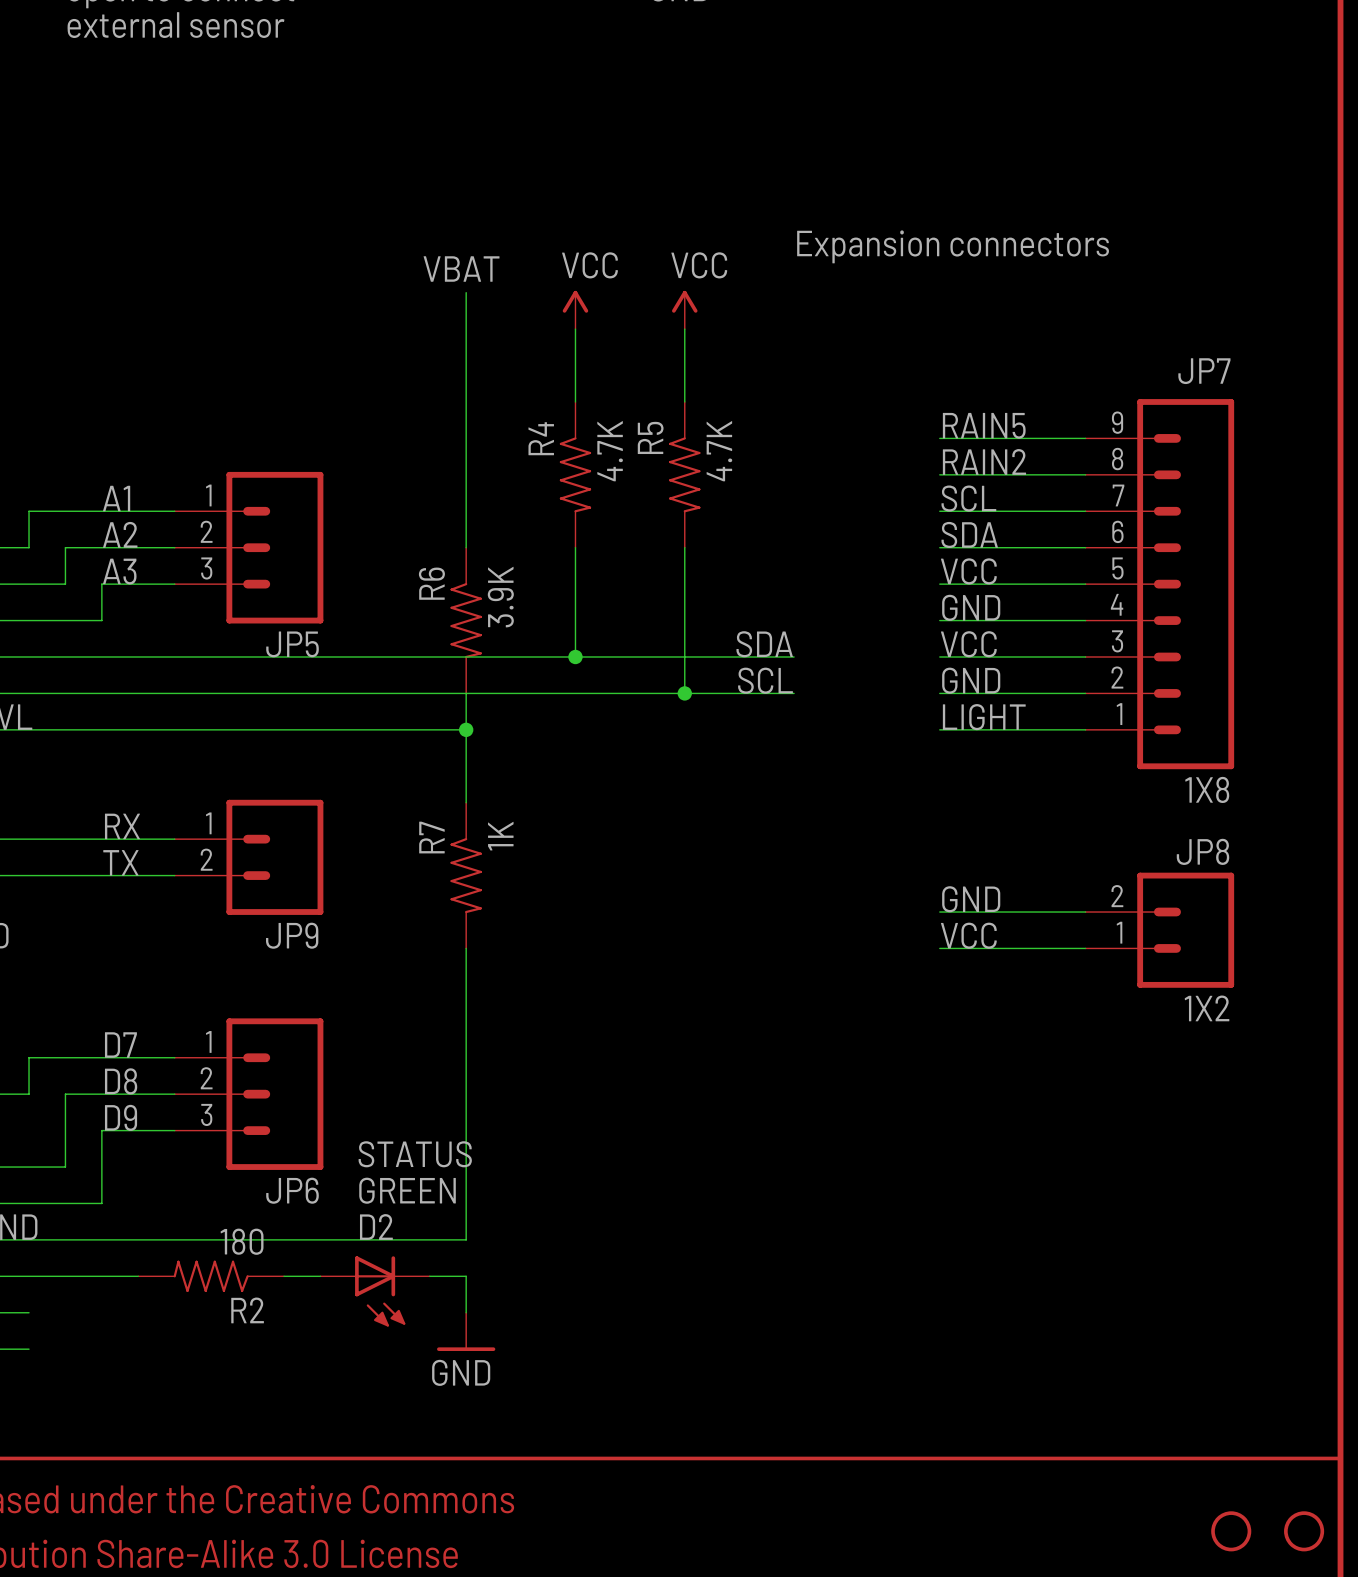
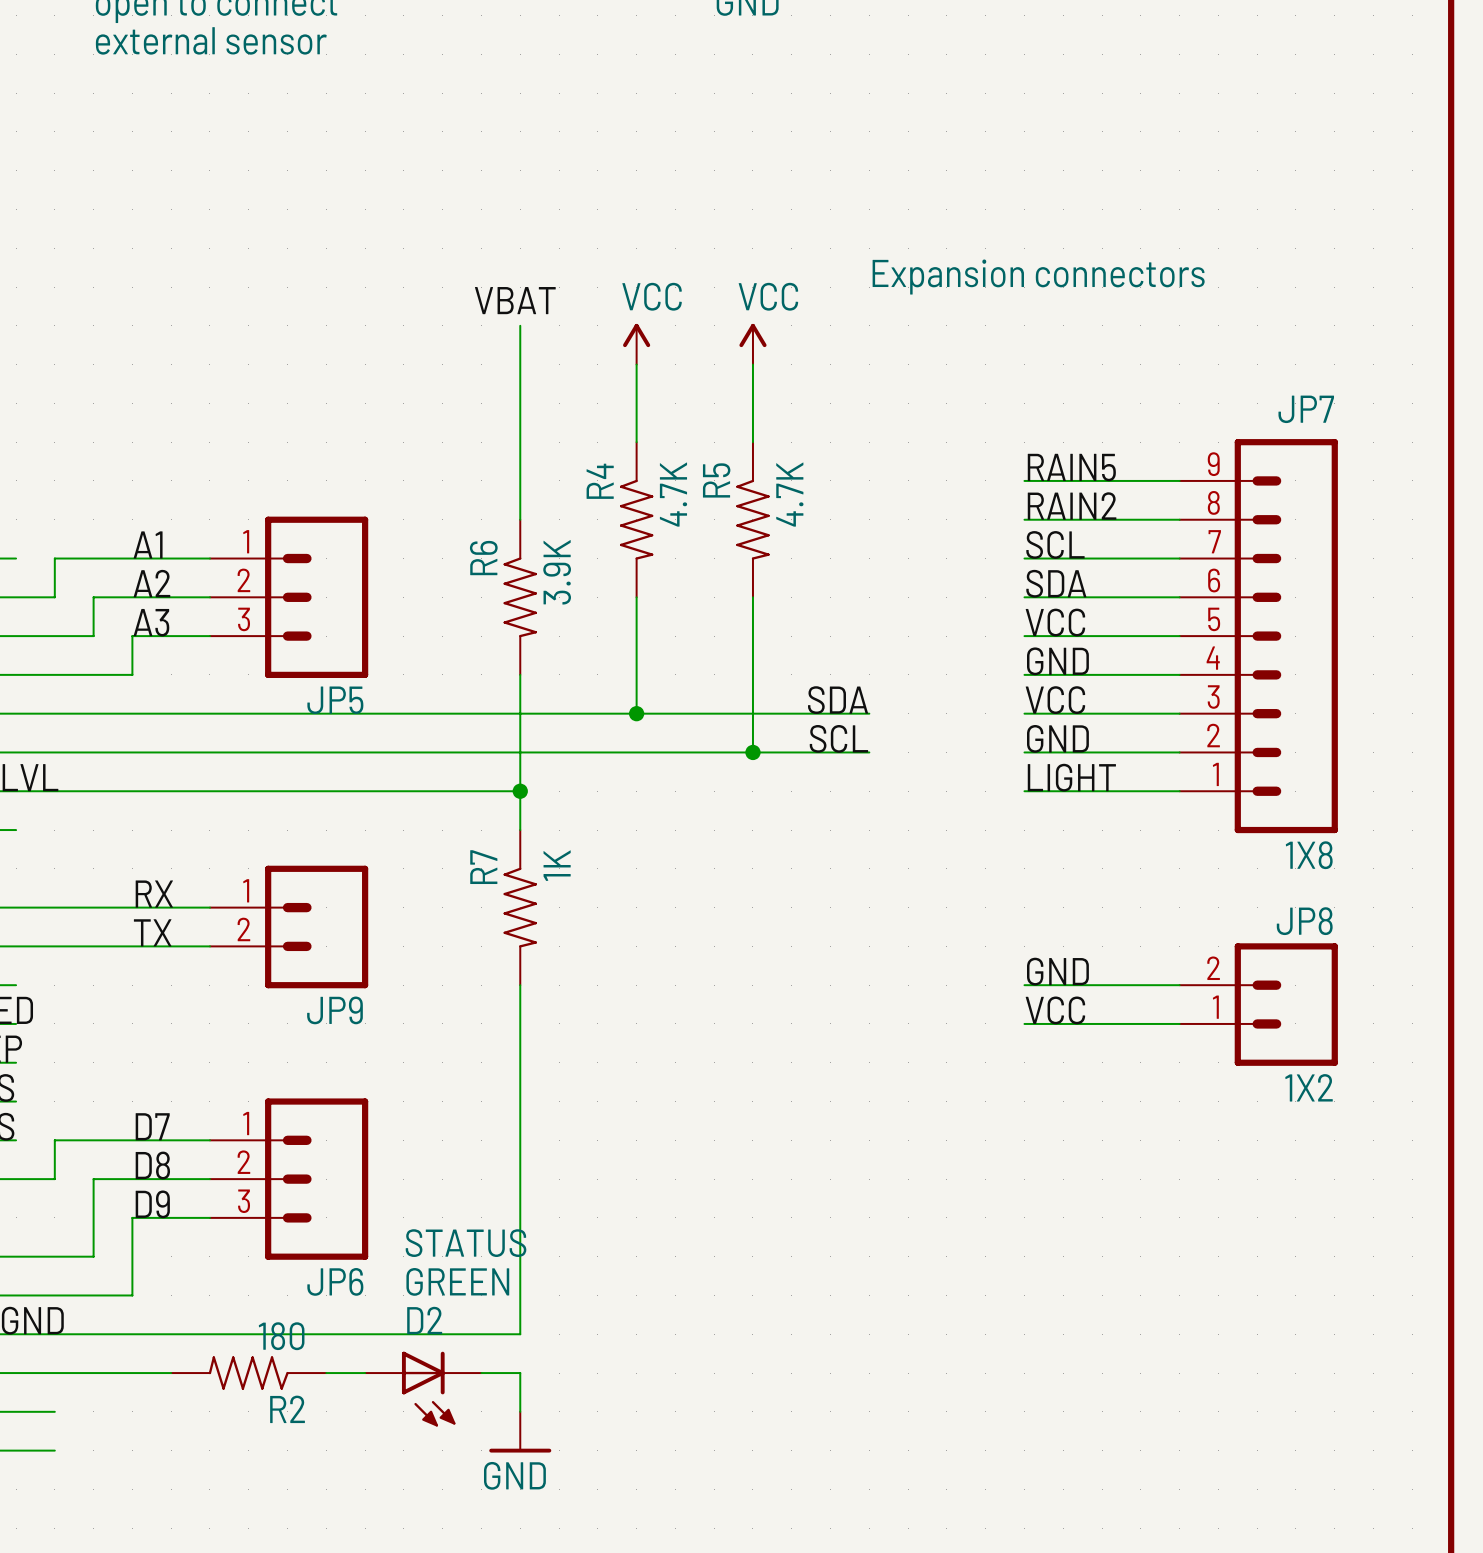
R6 position: (466, 620) -> (520, 597)
R7 position: (466, 875) -> (520, 907)

